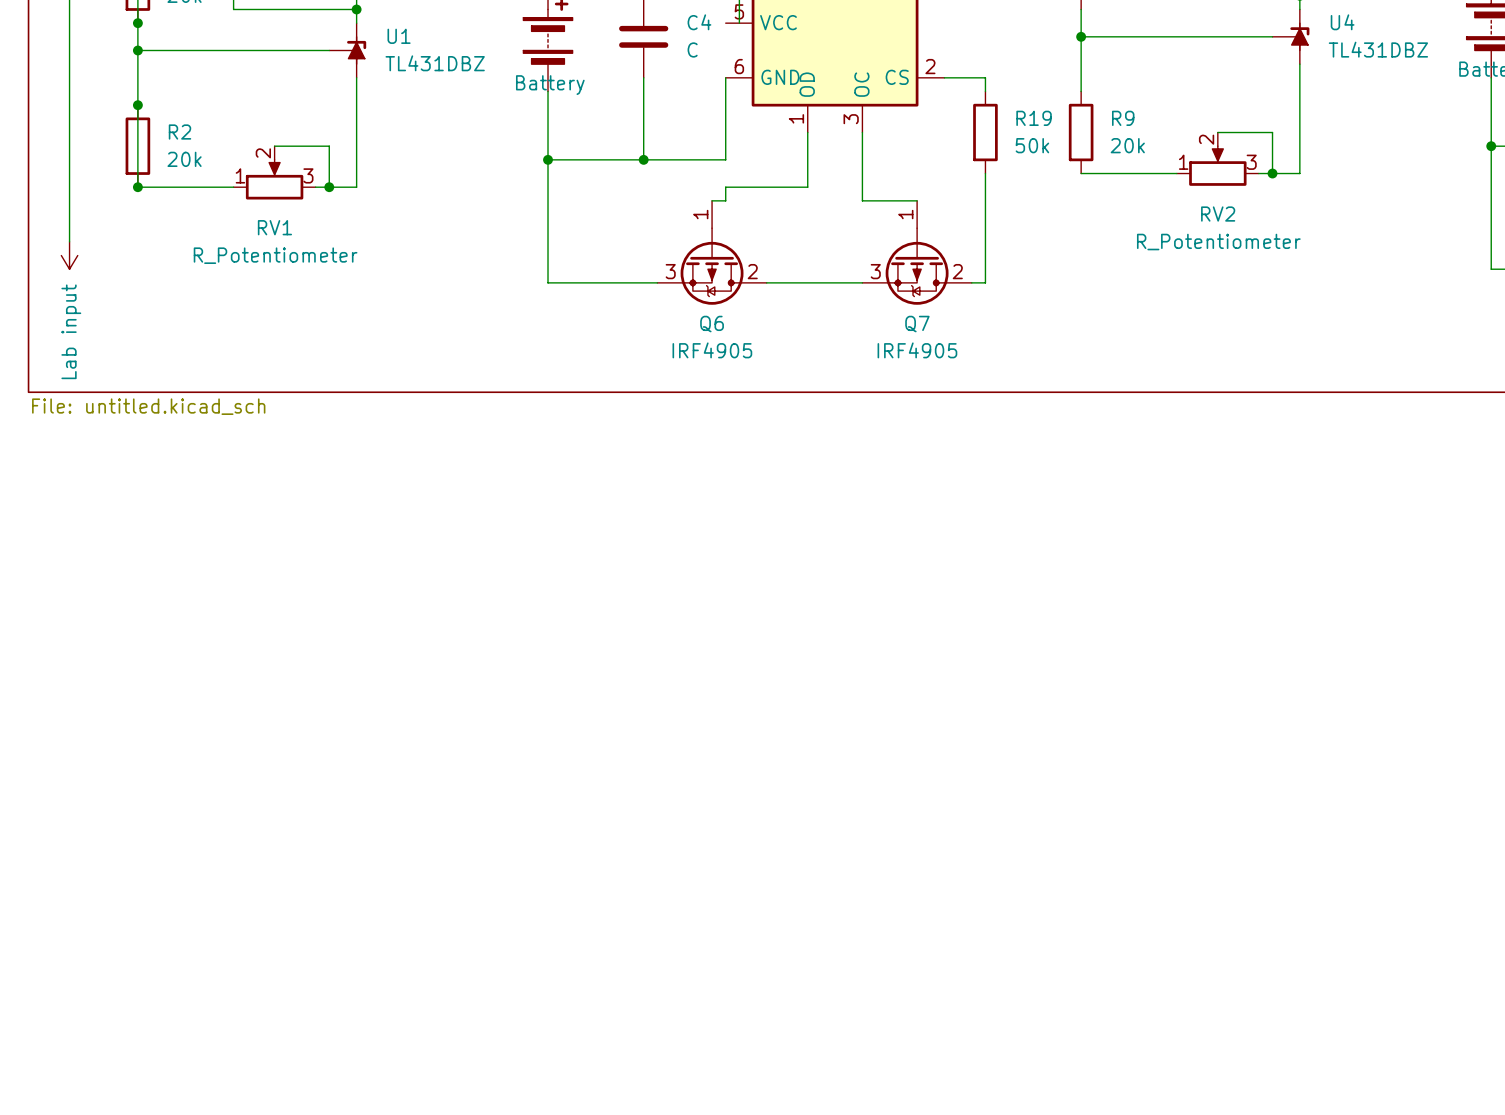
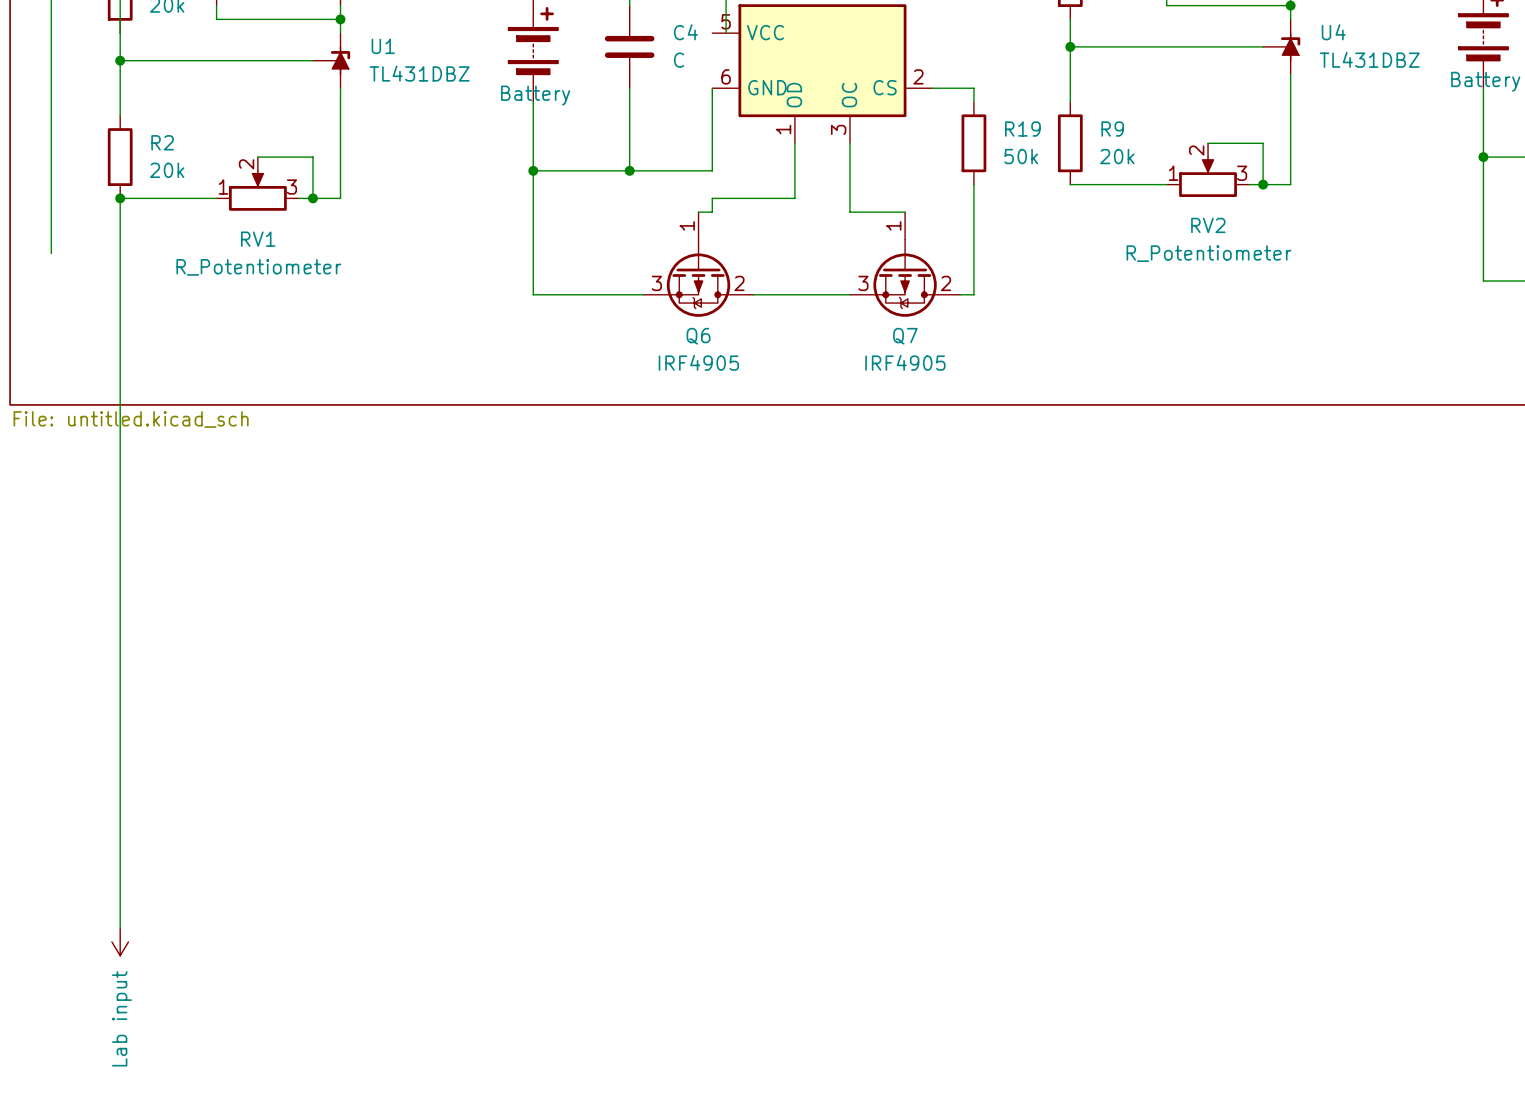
junction: (137, 23) -> none
wire: (137, 105) (137, 187) -> (120, 928) (120, 198)
junction: (137, 105) -> none
power symbol: Lab input (69, 255) -> none
power symbol: none -> Lab input (120, 941)

